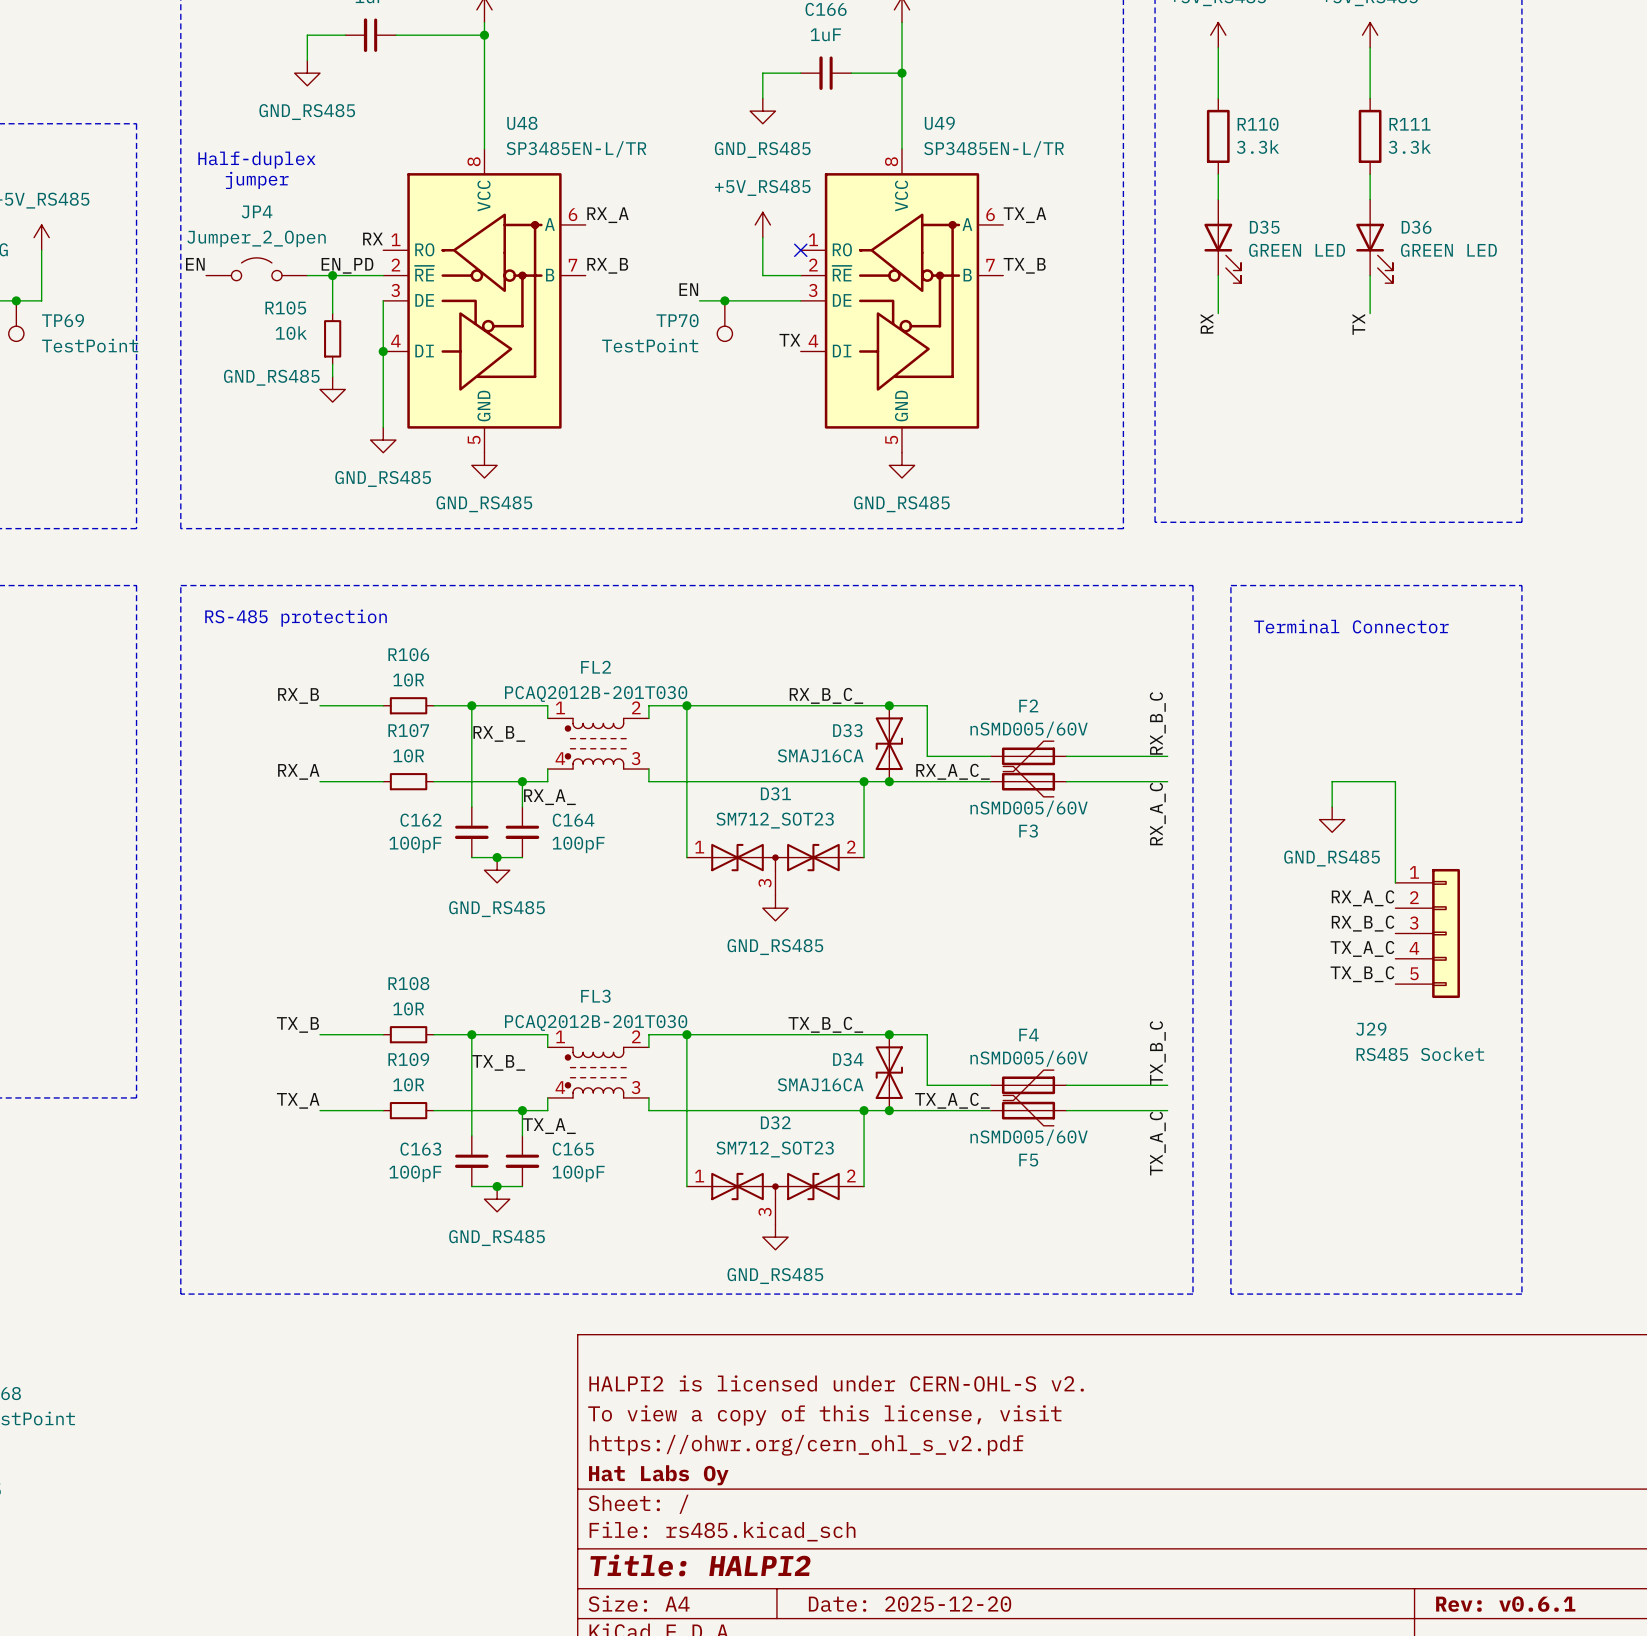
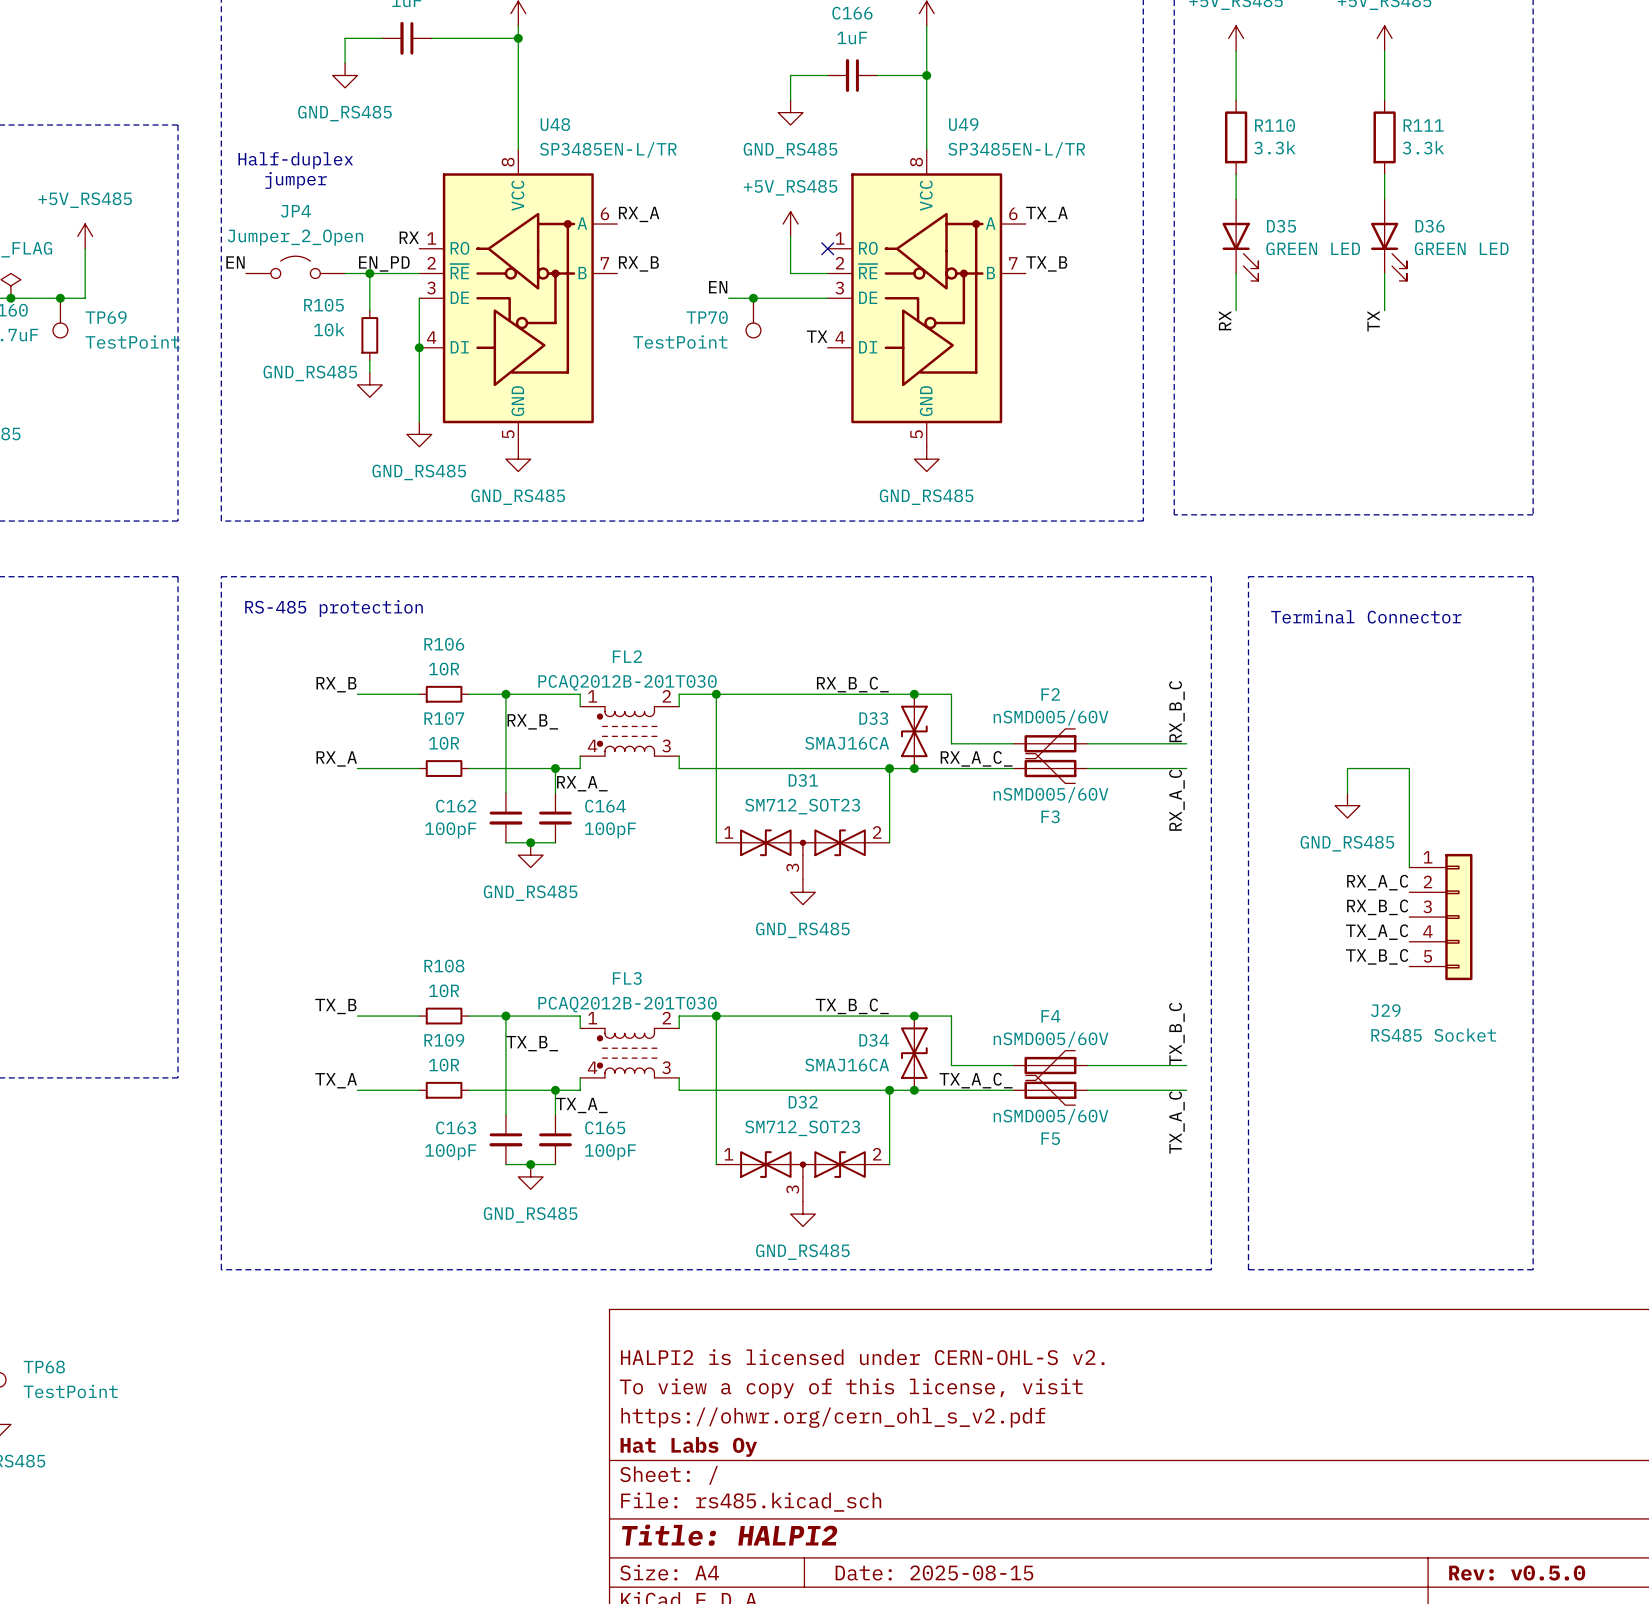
title block: Date: 2025-12-20 (910, 1604) -> Date: 2025-08-15 (934, 1572)
title block: Rev: v0.6.1 (1505, 1604) -> Rev: v0.5.0 (1517, 1572)

